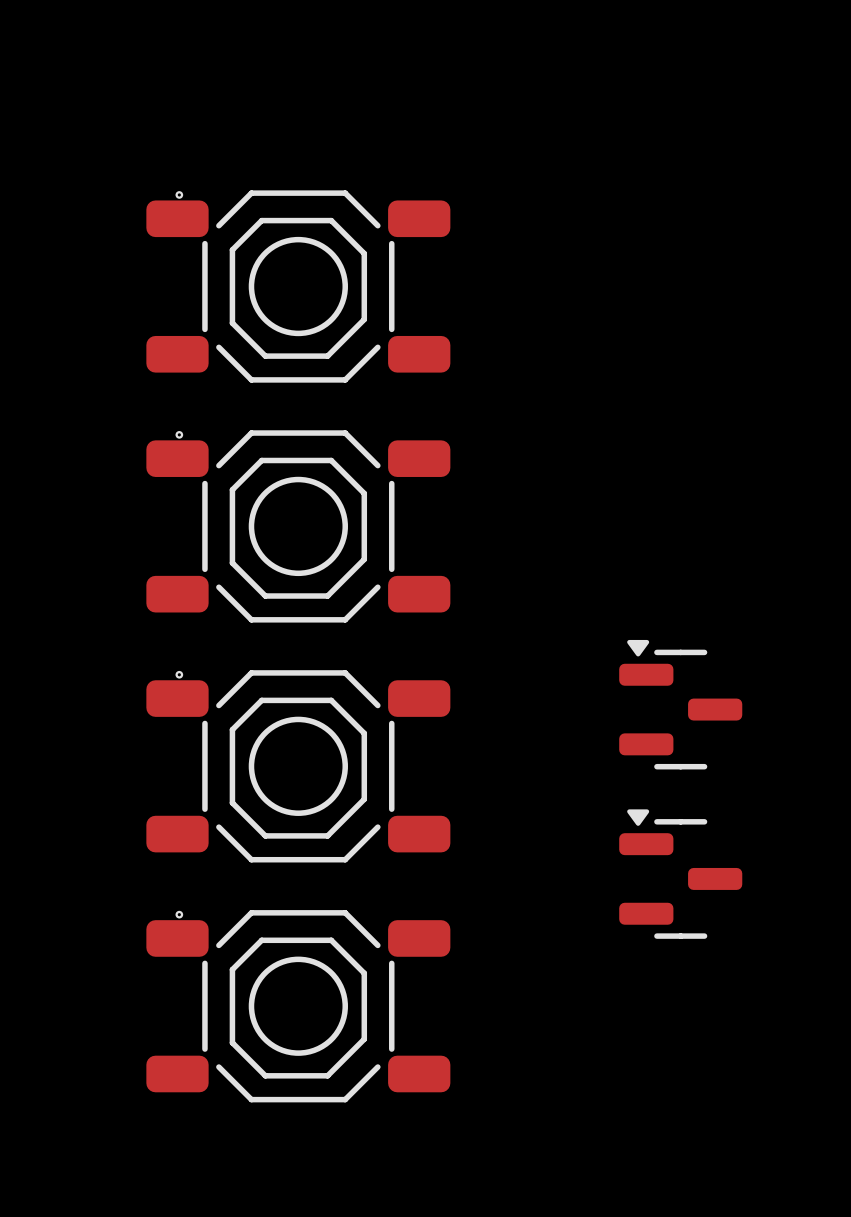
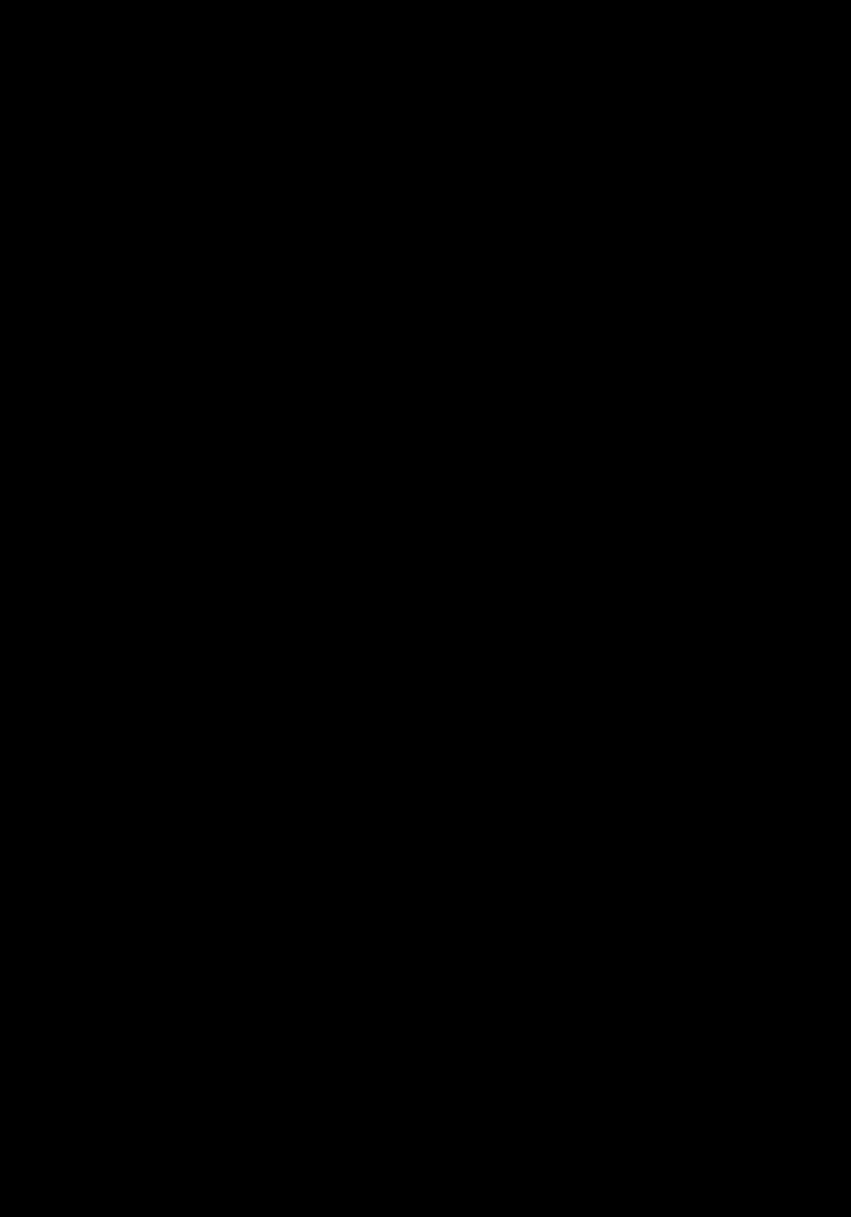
part: (298, 286) -> none
part: (298, 526) -> none
part: (680, 704) -> none
part: (298, 766) -> none
part: (680, 874) -> none
part: (298, 1006) -> none

